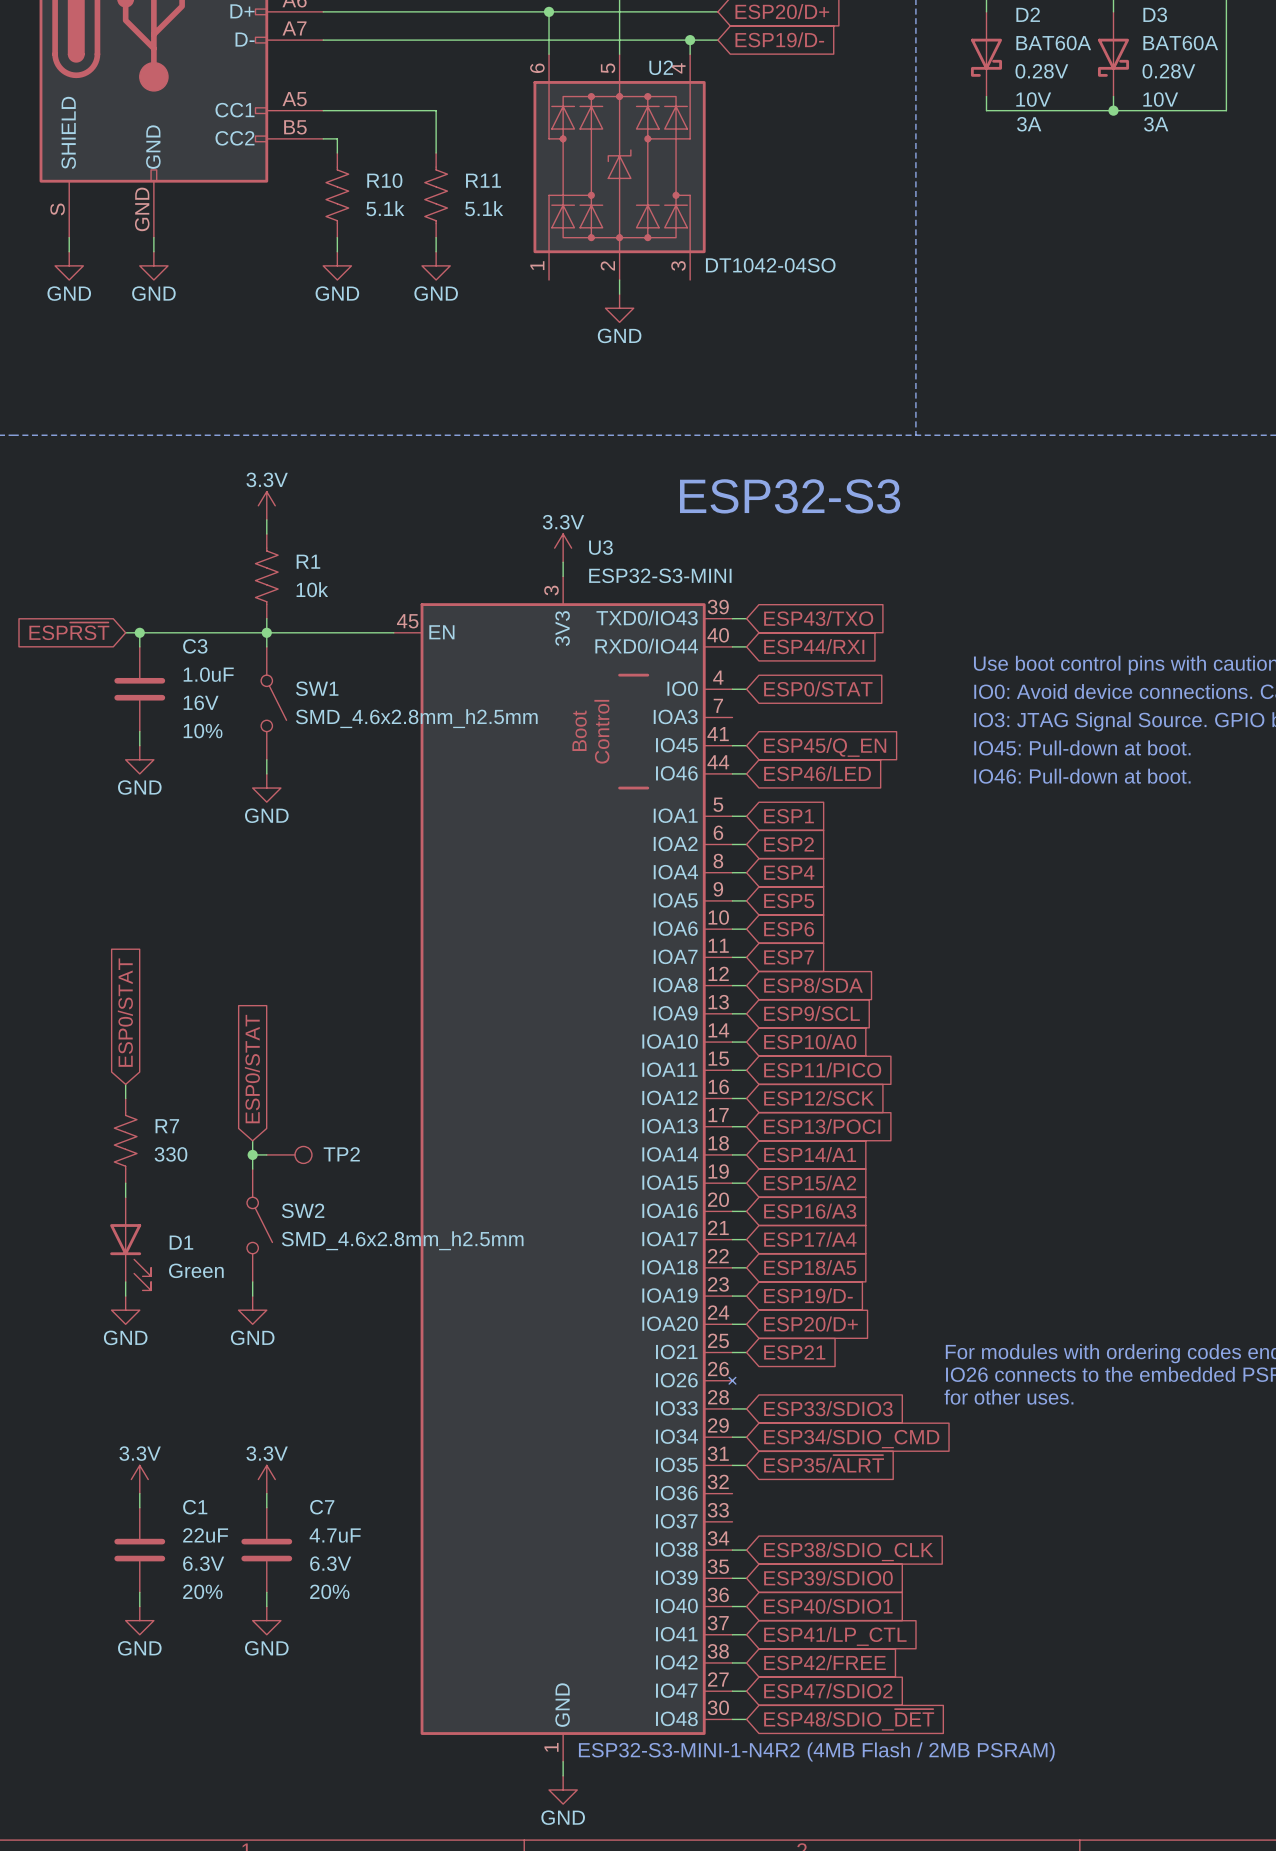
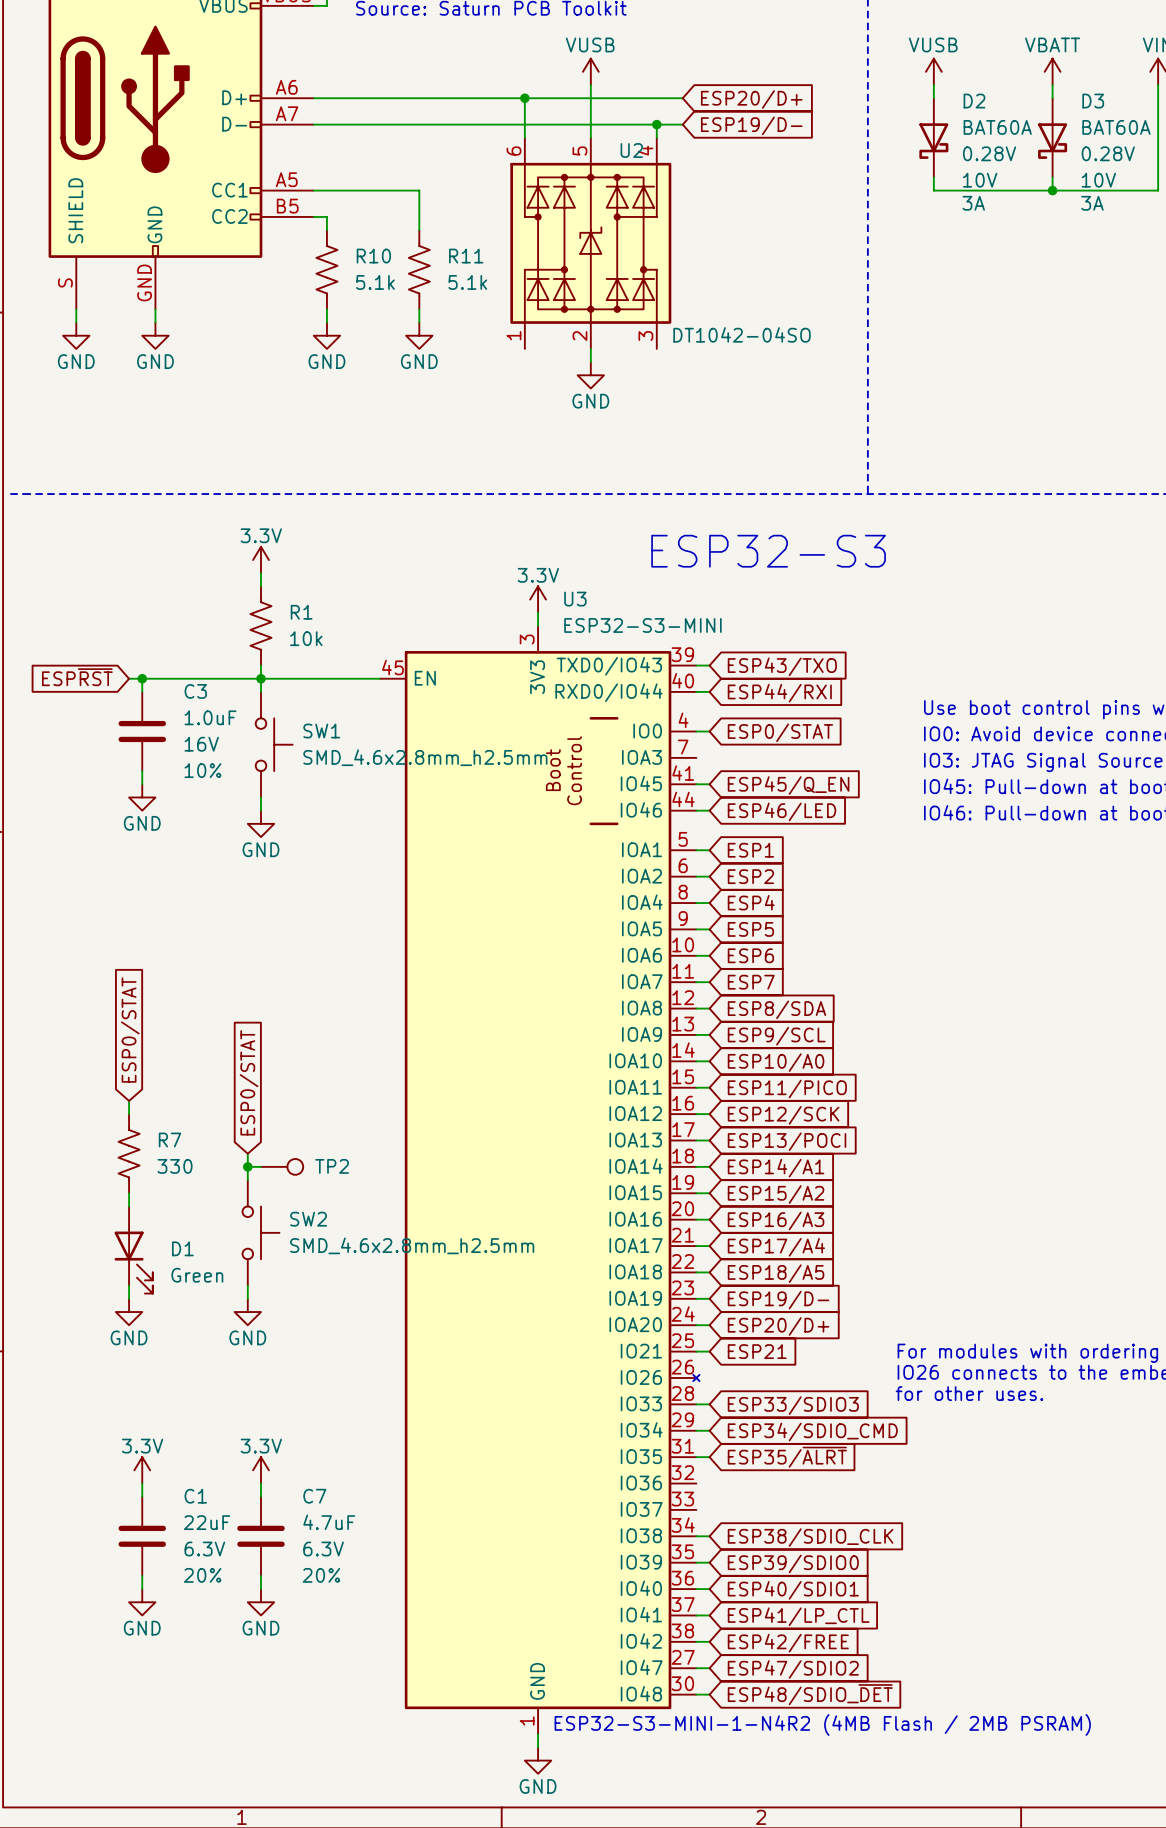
SW1 symbol: [261, 646, 287, 760] -> [255, 691, 293, 798]
SW2 symbol: [247, 1169, 273, 1282] -> [242, 1180, 280, 1286]

